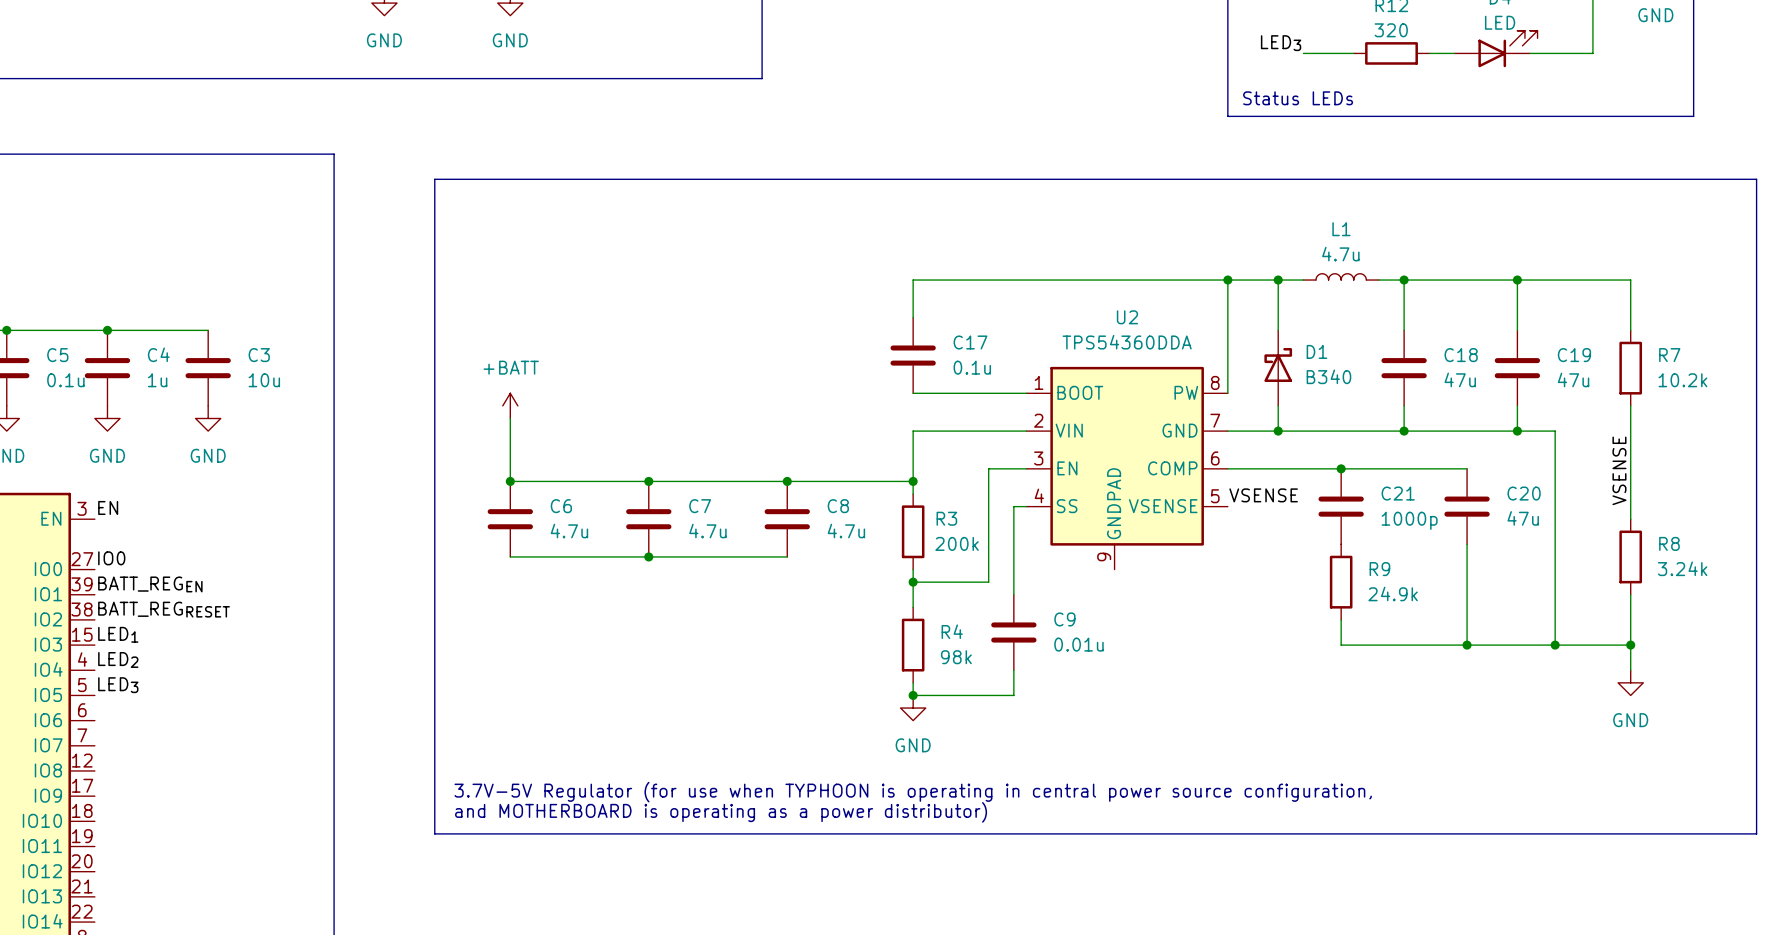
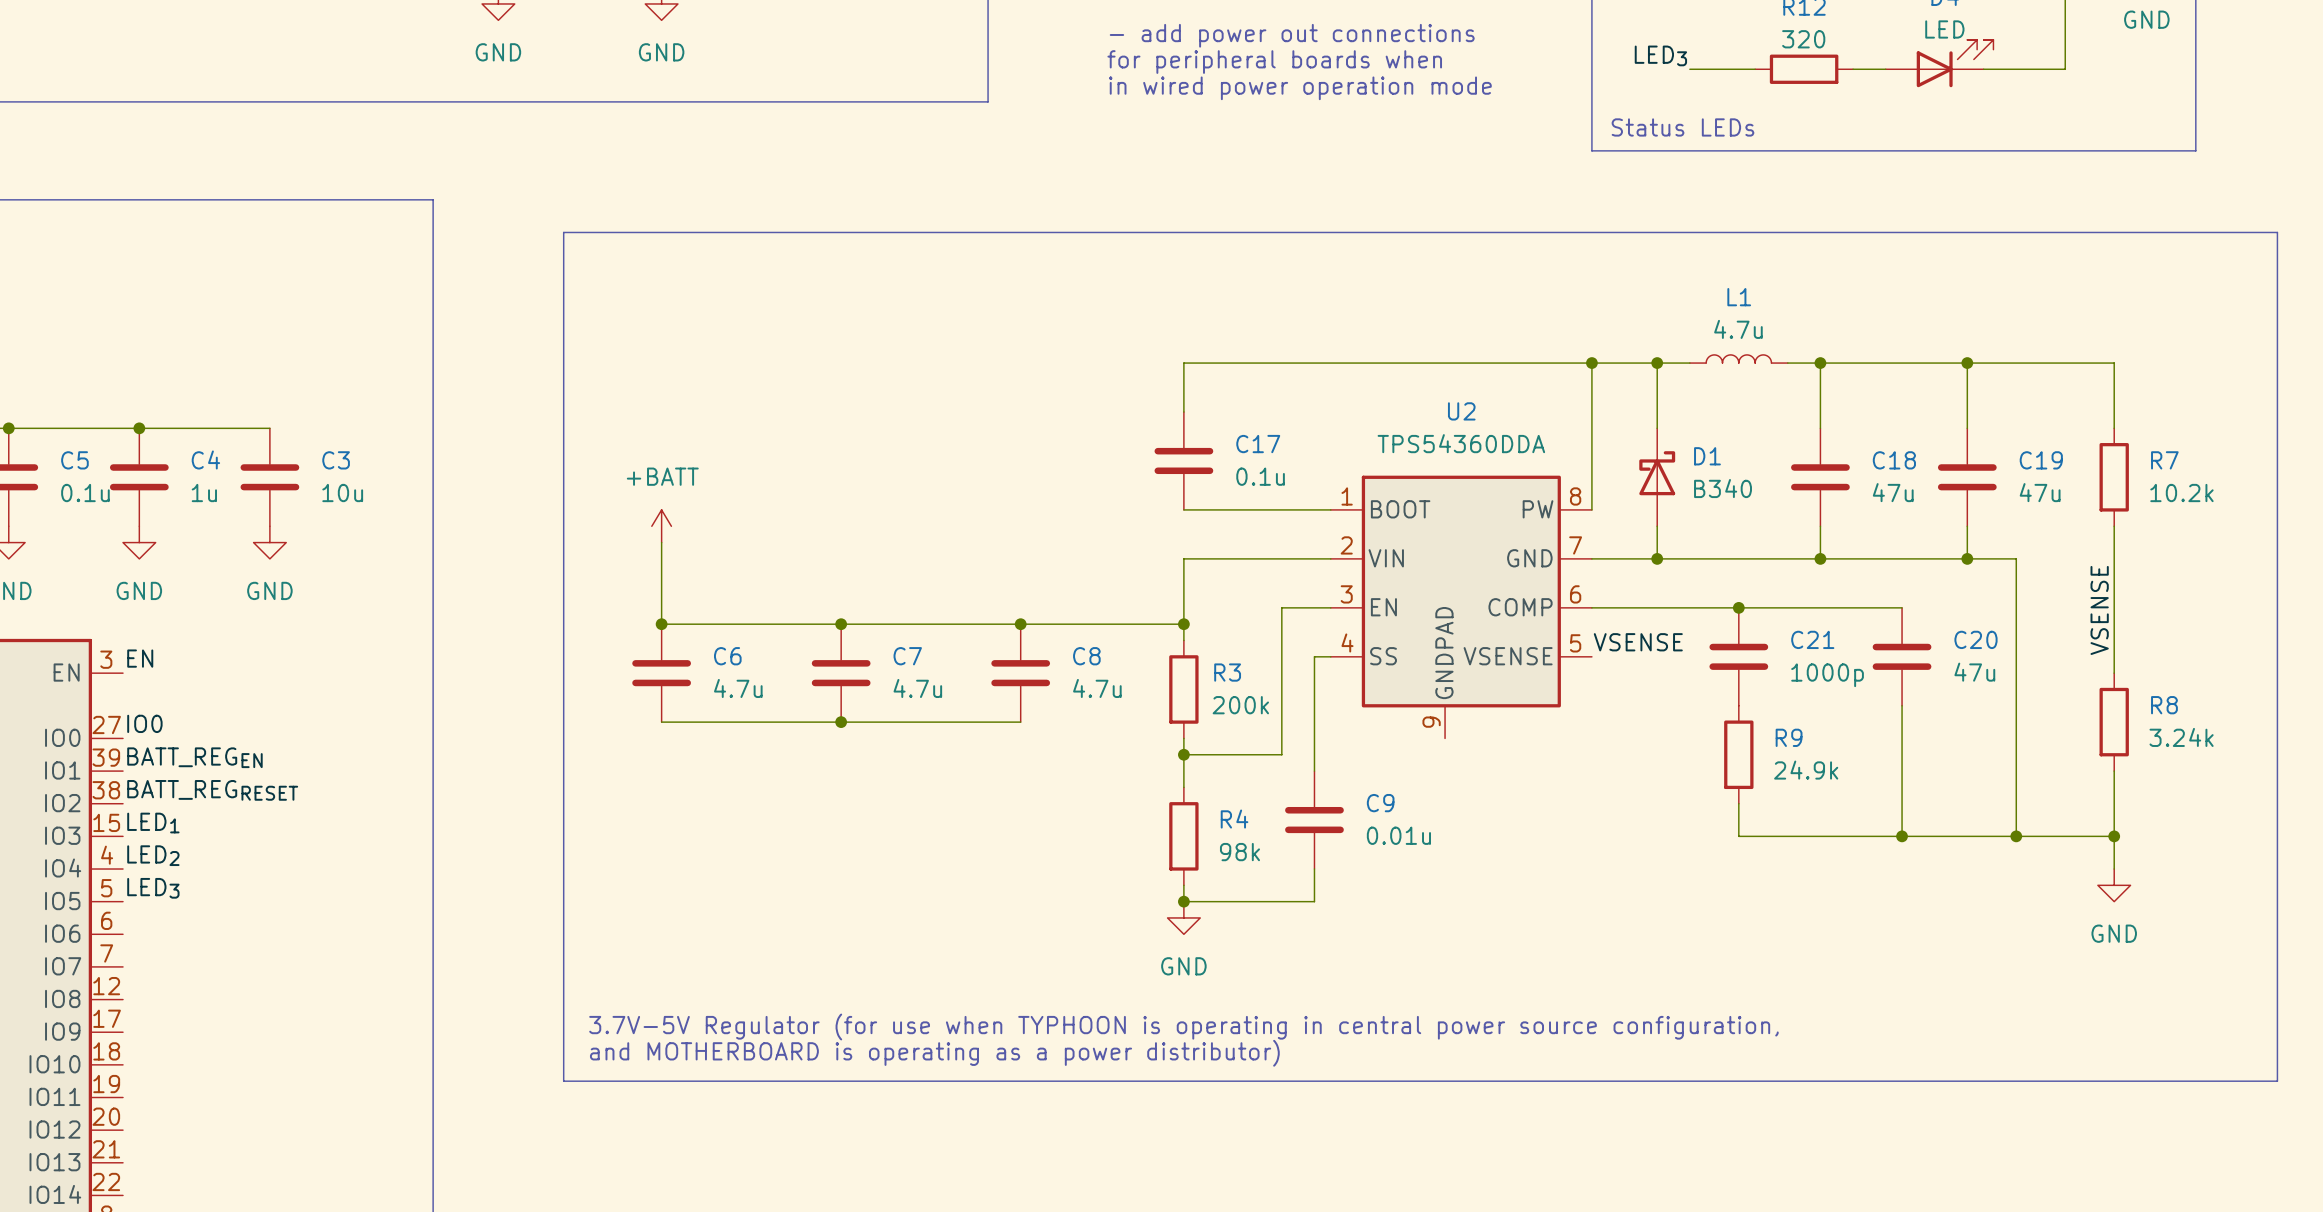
text: none -> - add power out connections (1292, 35)
text: none -> for peripheral boards when (1274, 62)
text: none -> in wired power operation mode (1300, 88)

